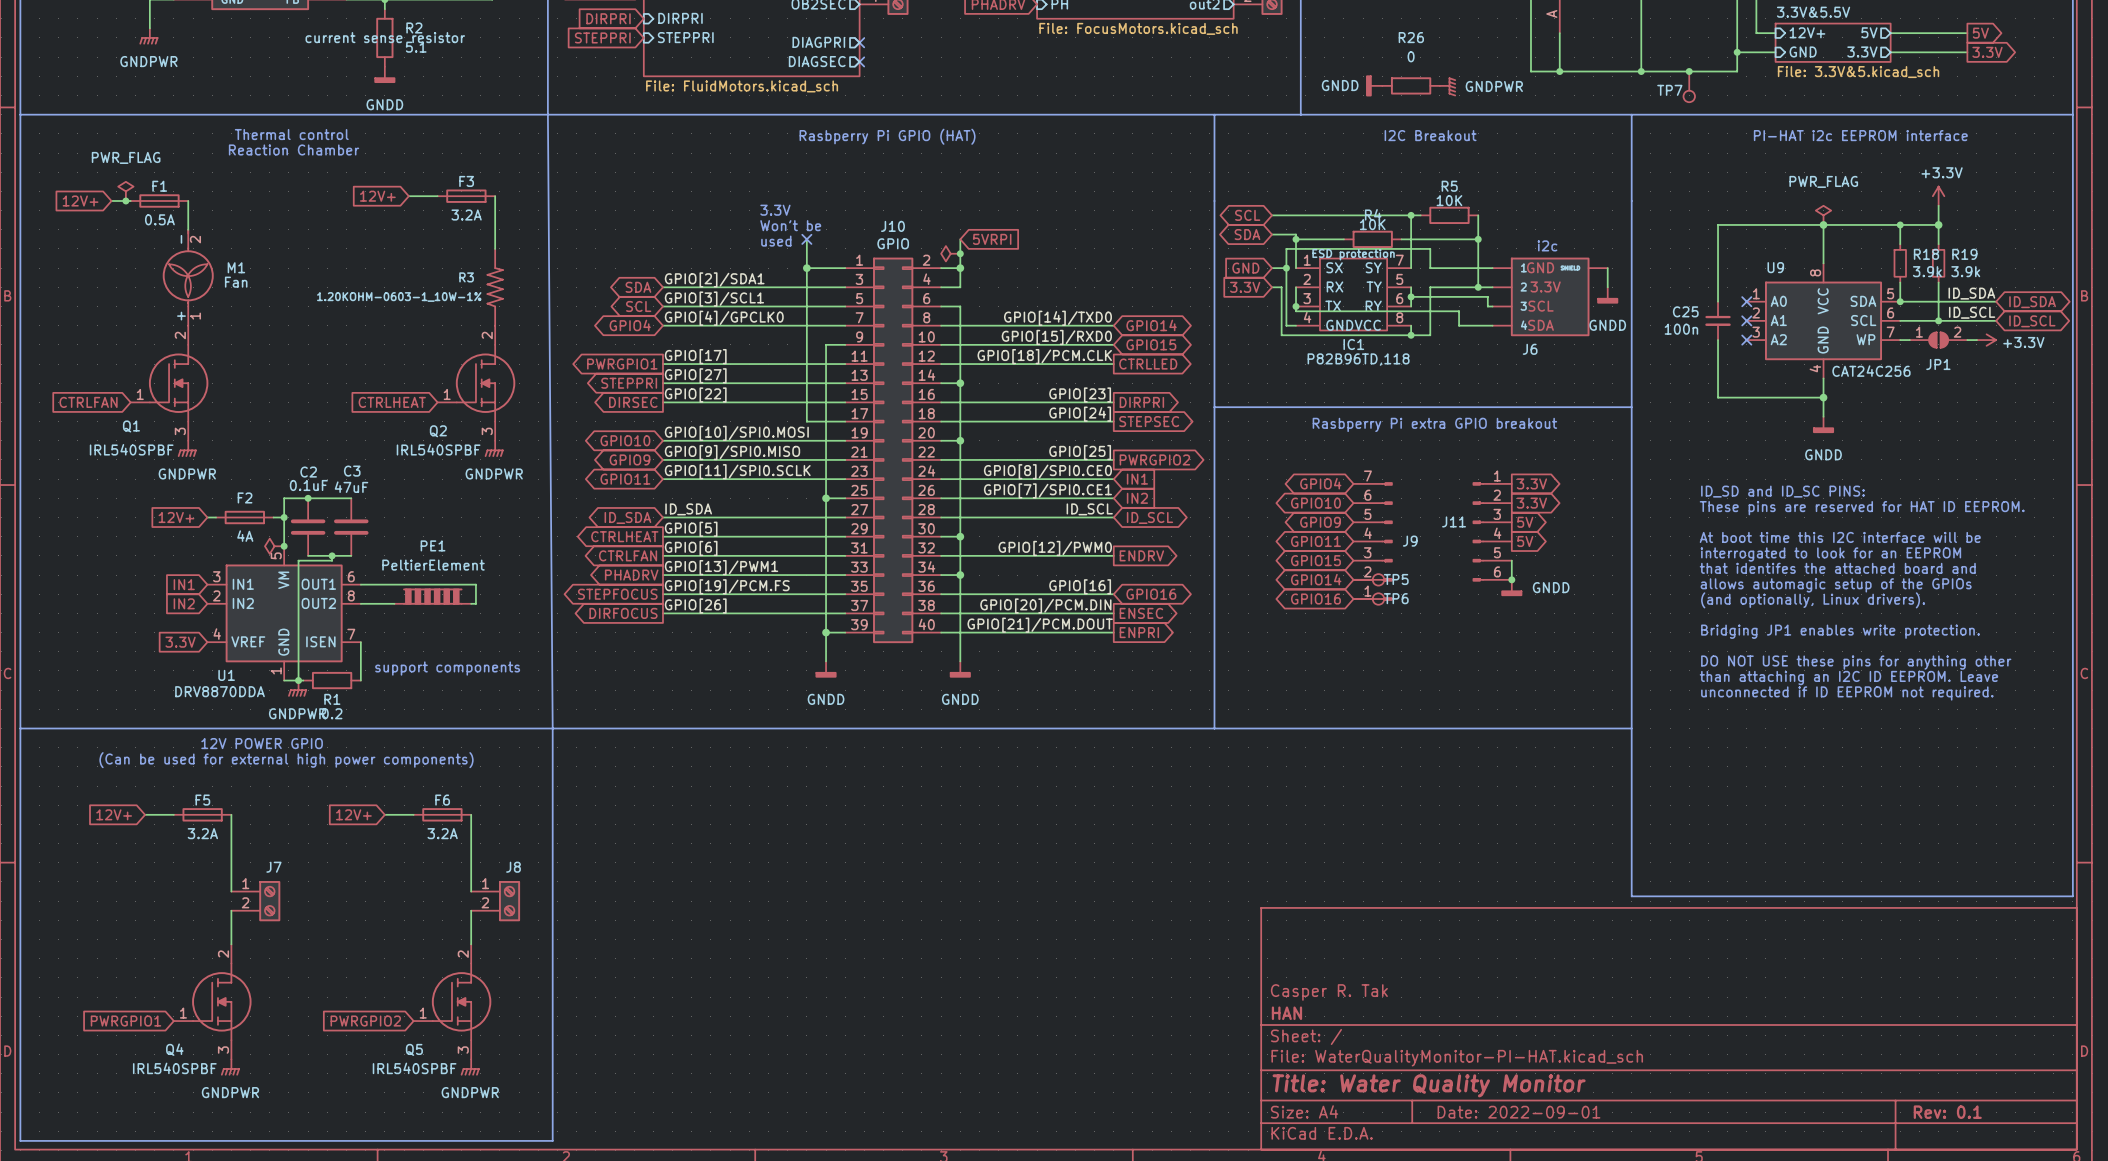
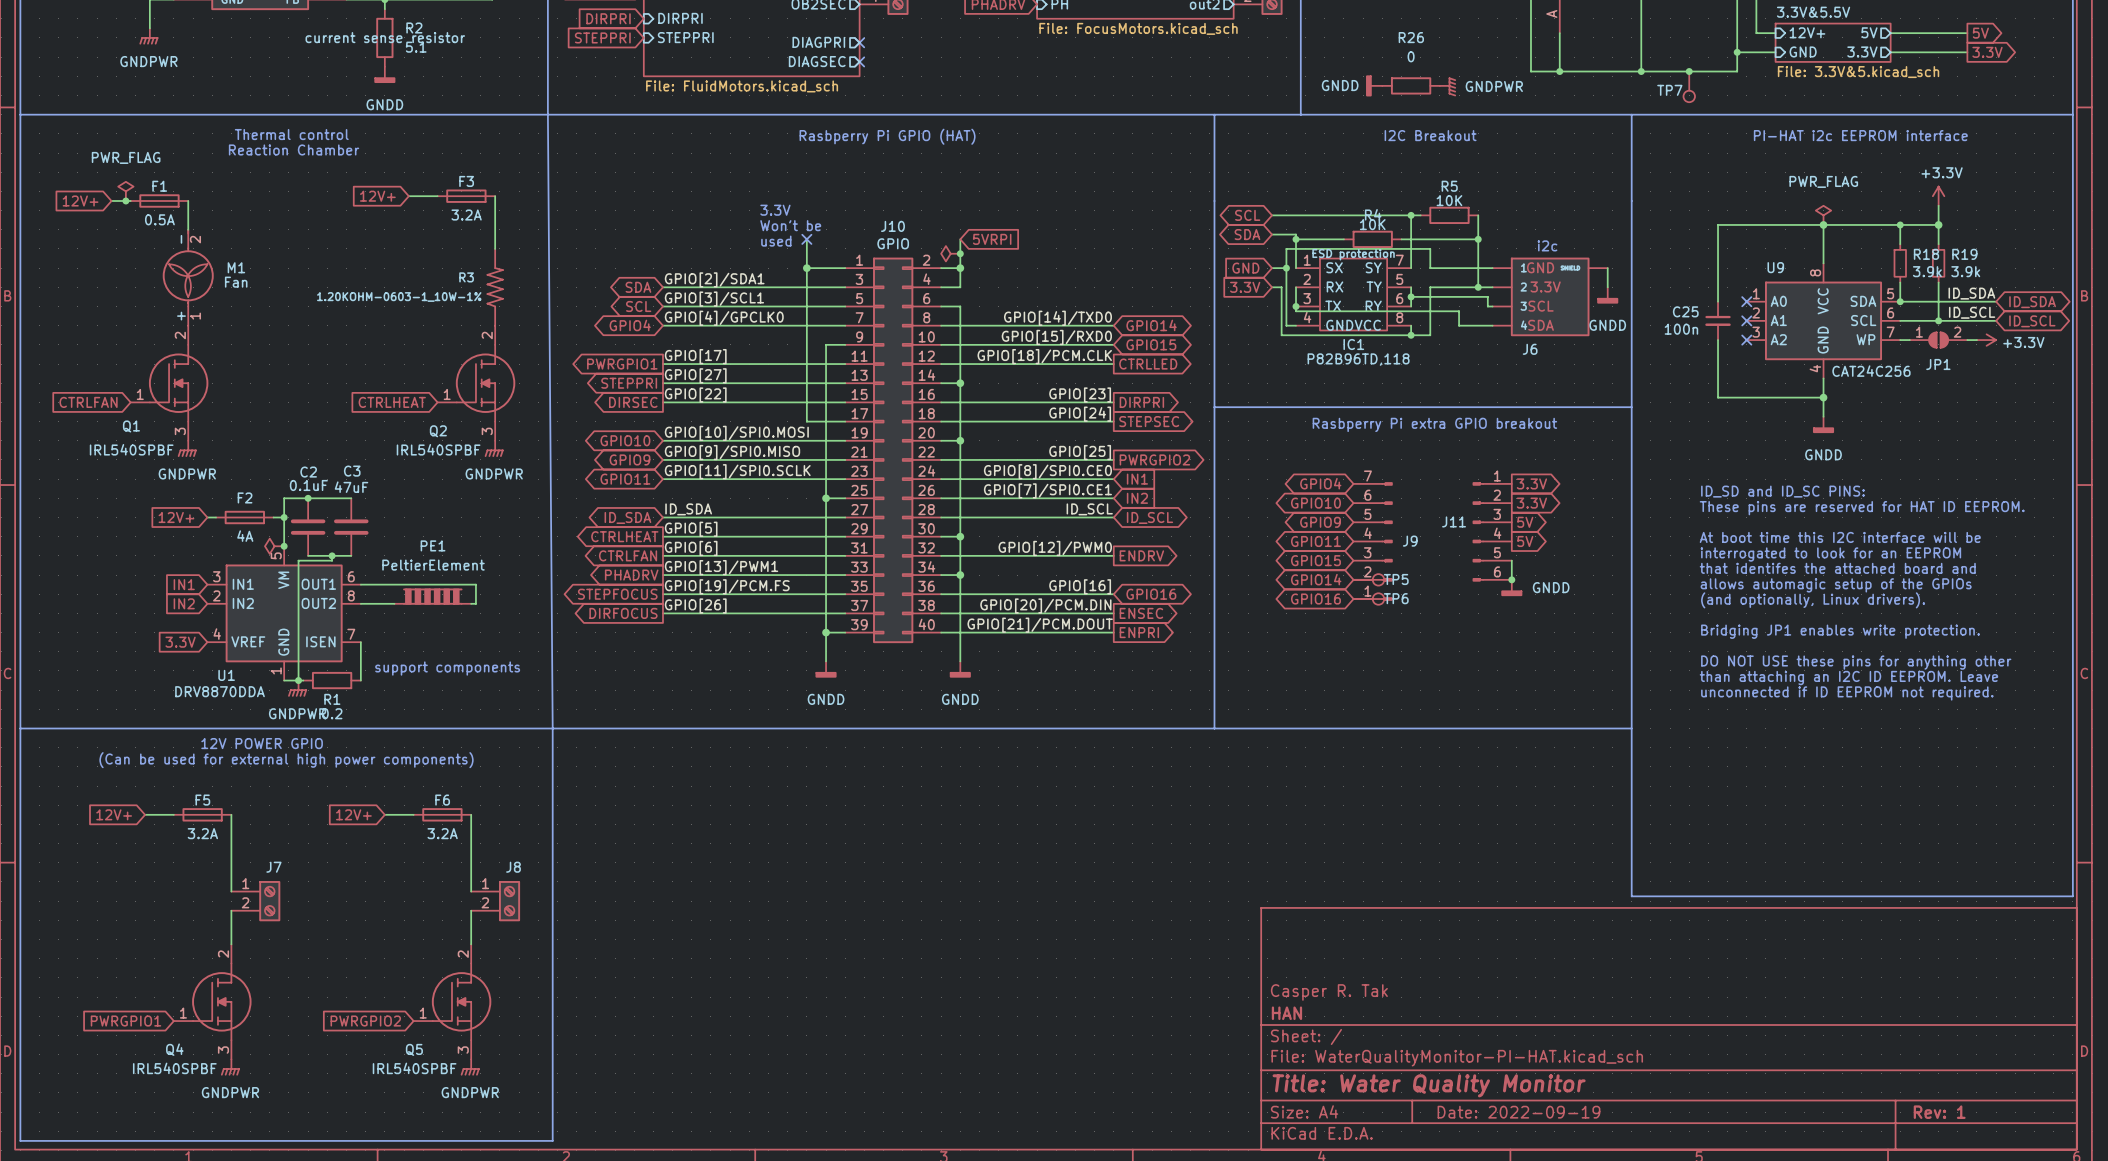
title block: Date: 2022-09-01 (1518, 1112) -> Date: 2022-09-19 (1518, 1112)
title block: Rev: 0.1 (1947, 1112) -> Rev: 1 (1939, 1112)

